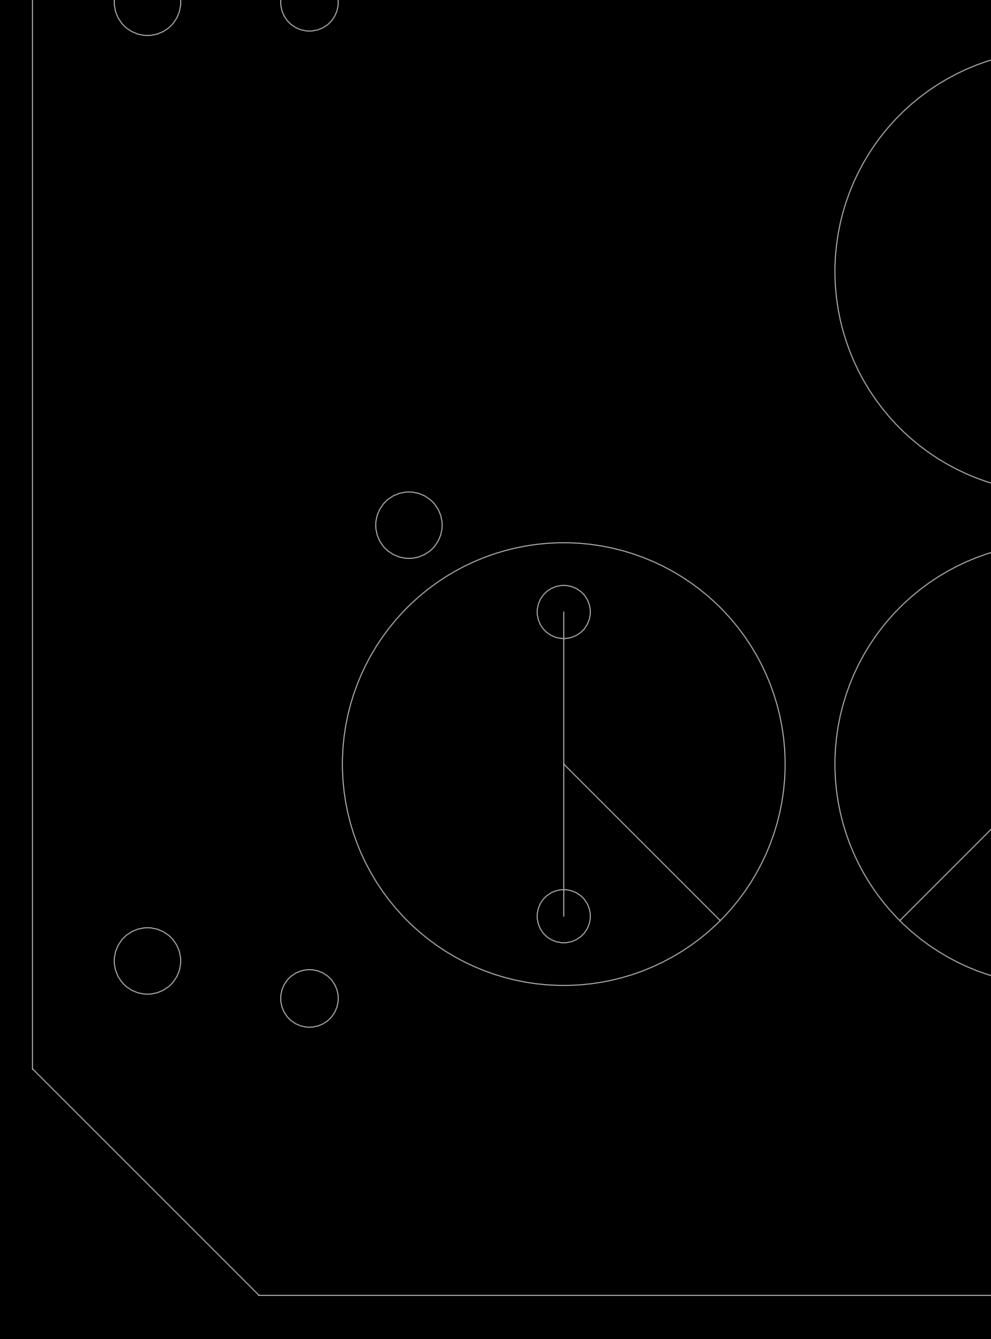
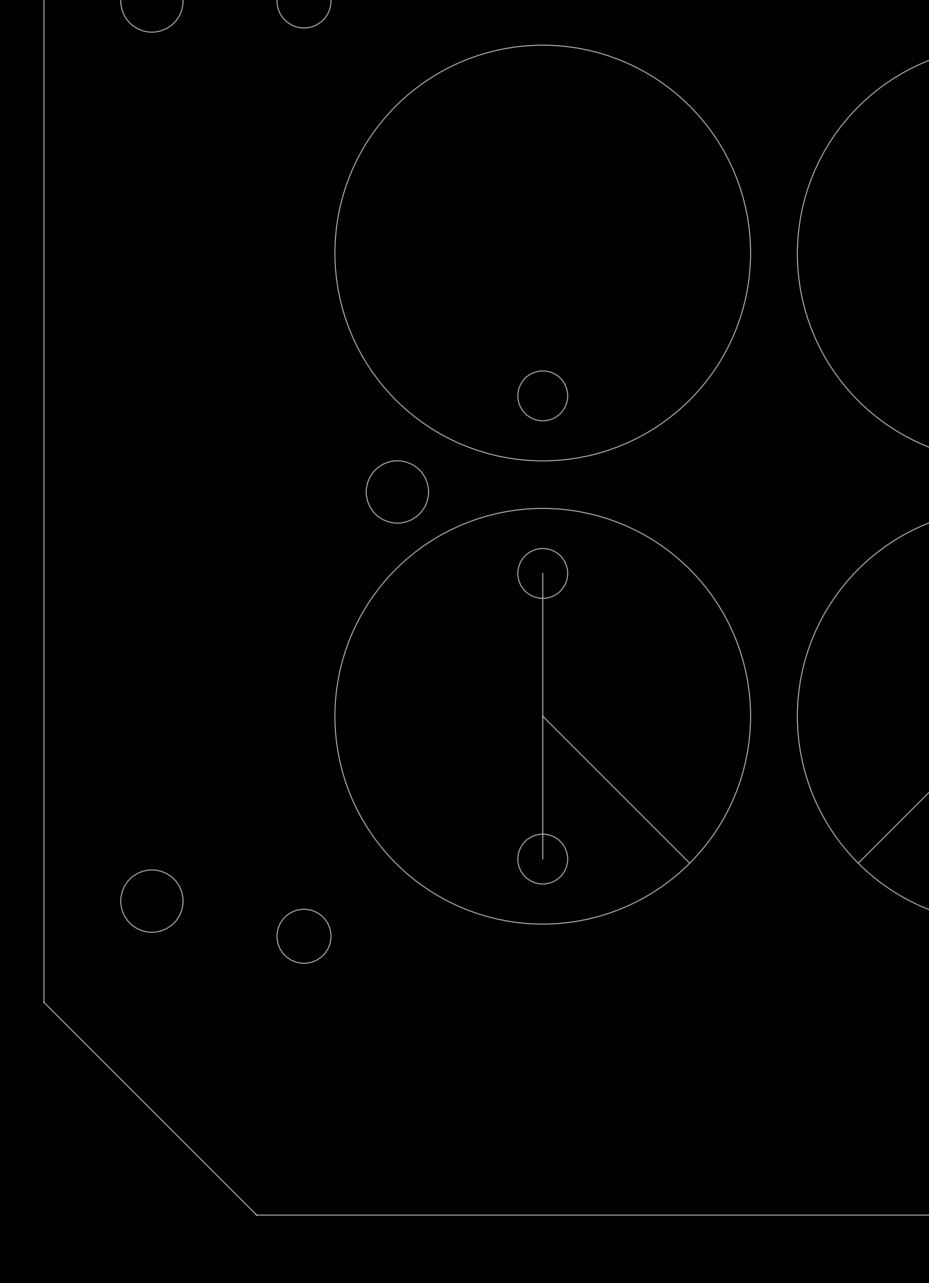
drawing: none -> [334, 44, 752, 462]

